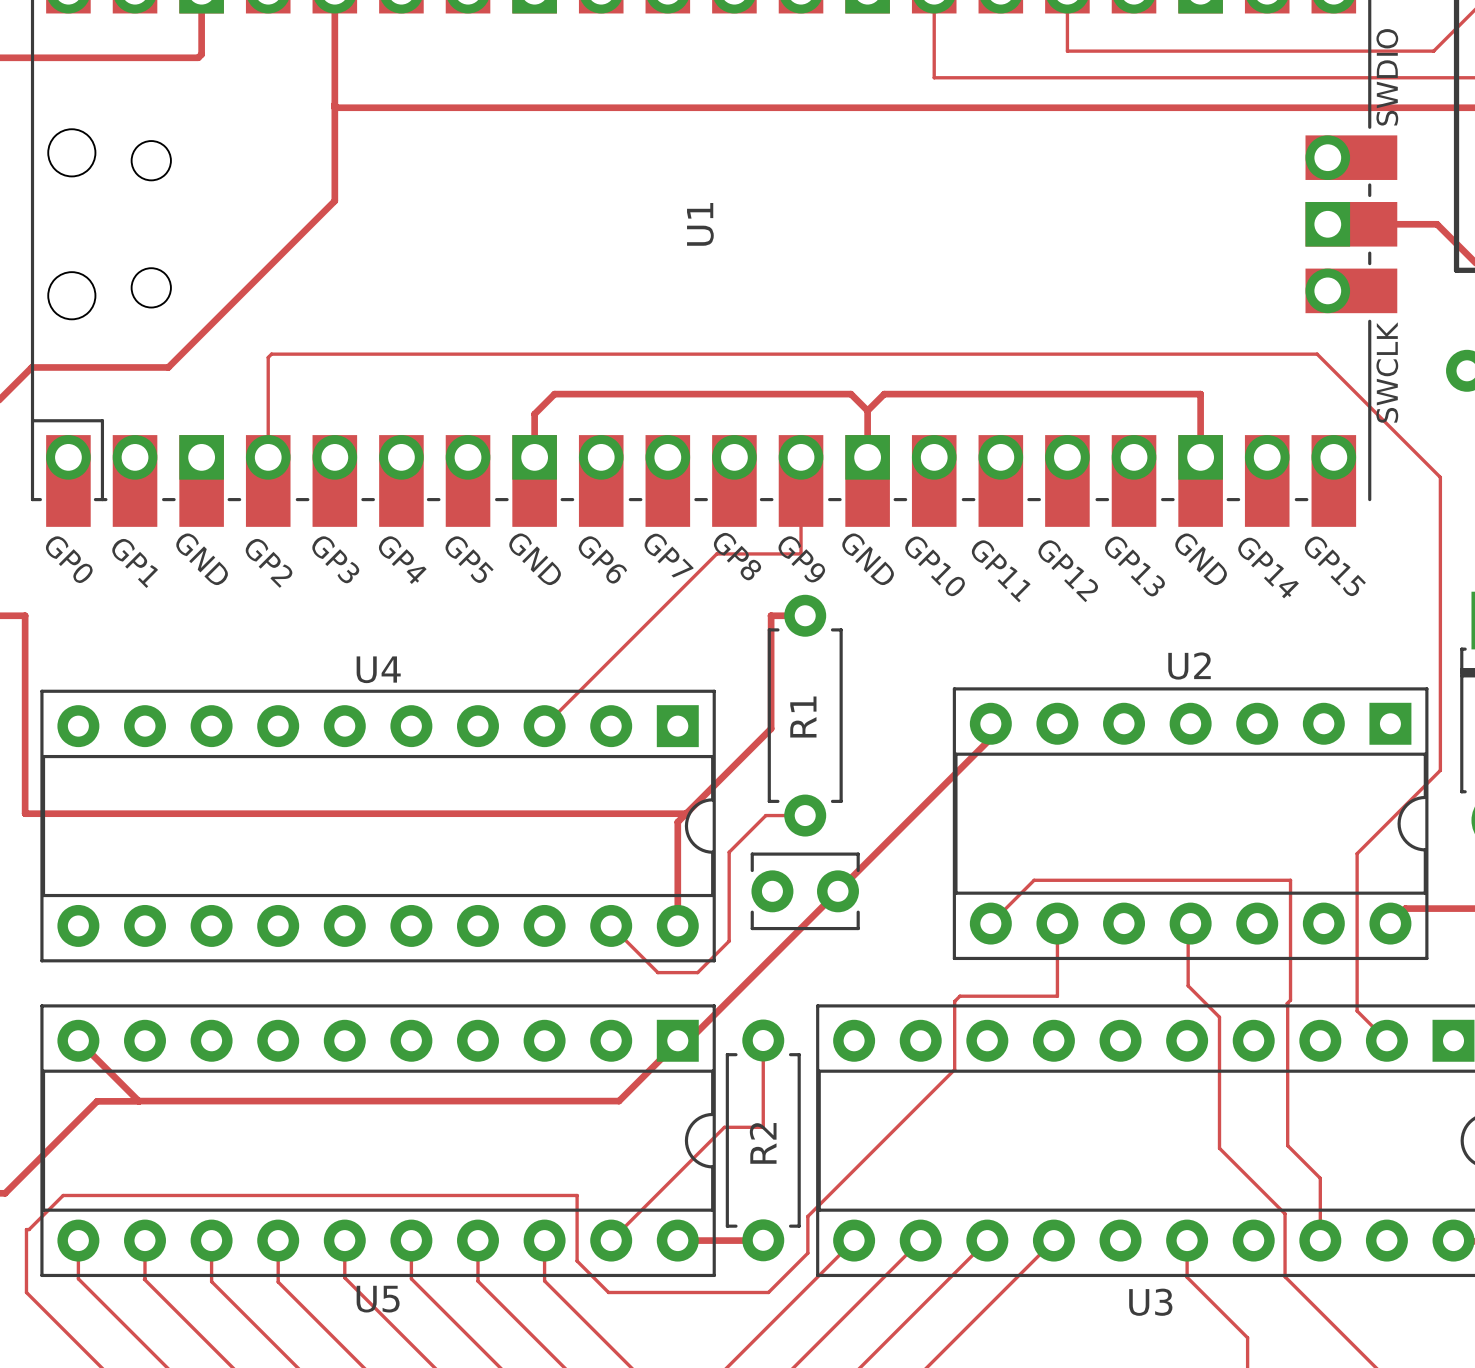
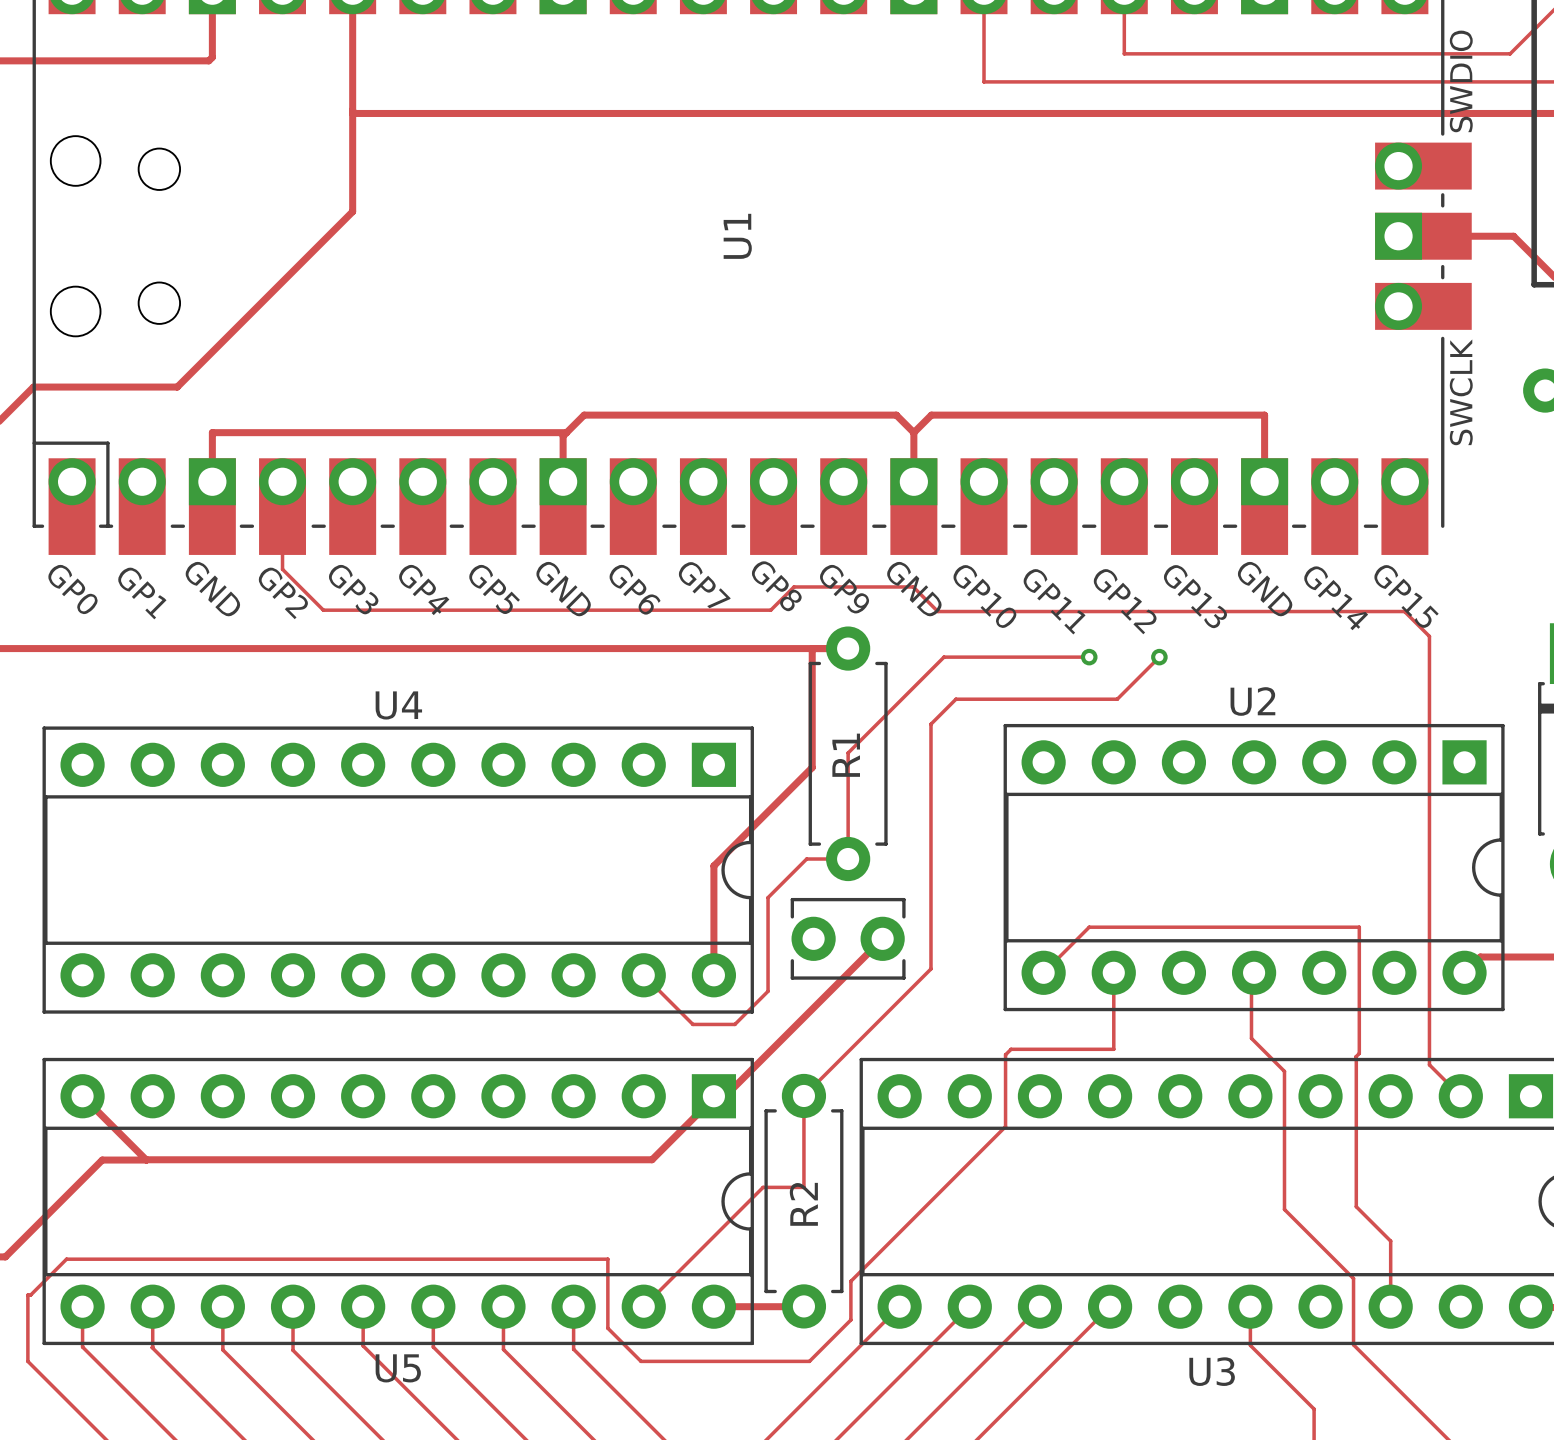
track: none -> (566, 432) (212, 432) (212, 481)
track: (268, 457) (268, 357) (271, 354) (1317, 354) (1440, 477) (1440, 770) (1357, 853) -> (282, 481) (282, 569) (323, 610) (770, 610) (794, 586) (913, 586) (937, 611) (1404, 611) (1429, 636) (1429, 899)
track: (801, 457) (801, 553) (716, 553) (544, 726) -> none
track: (25, 615) (25, 813) (686, 813) -> (26, 648) (812, 648)
track: none -> (1089, 657) (943, 657) (848, 752) (848, 859)
via: none -> (1089, 657)
track: none -> (1159, 657) (1117, 699) (955, 699) (930, 724) (930, 968) (803, 1095)
via: none -> (1159, 657)
track: (990, 738) (837, 891) -> none

